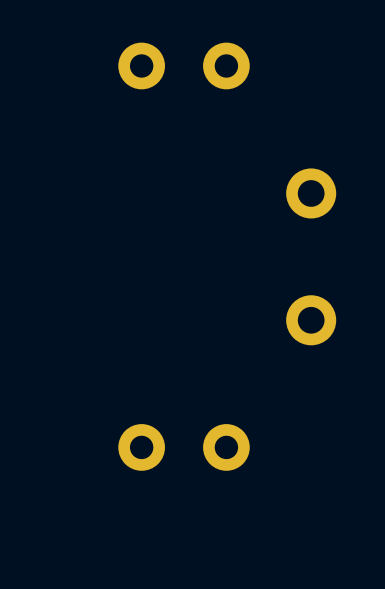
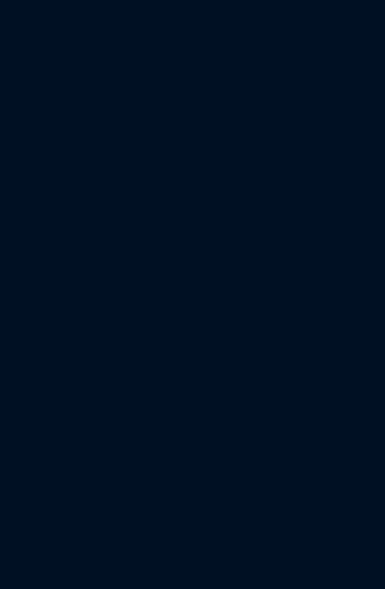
part: (184, 65) -> none
part: (311, 256) -> none
part: (184, 447) -> none

